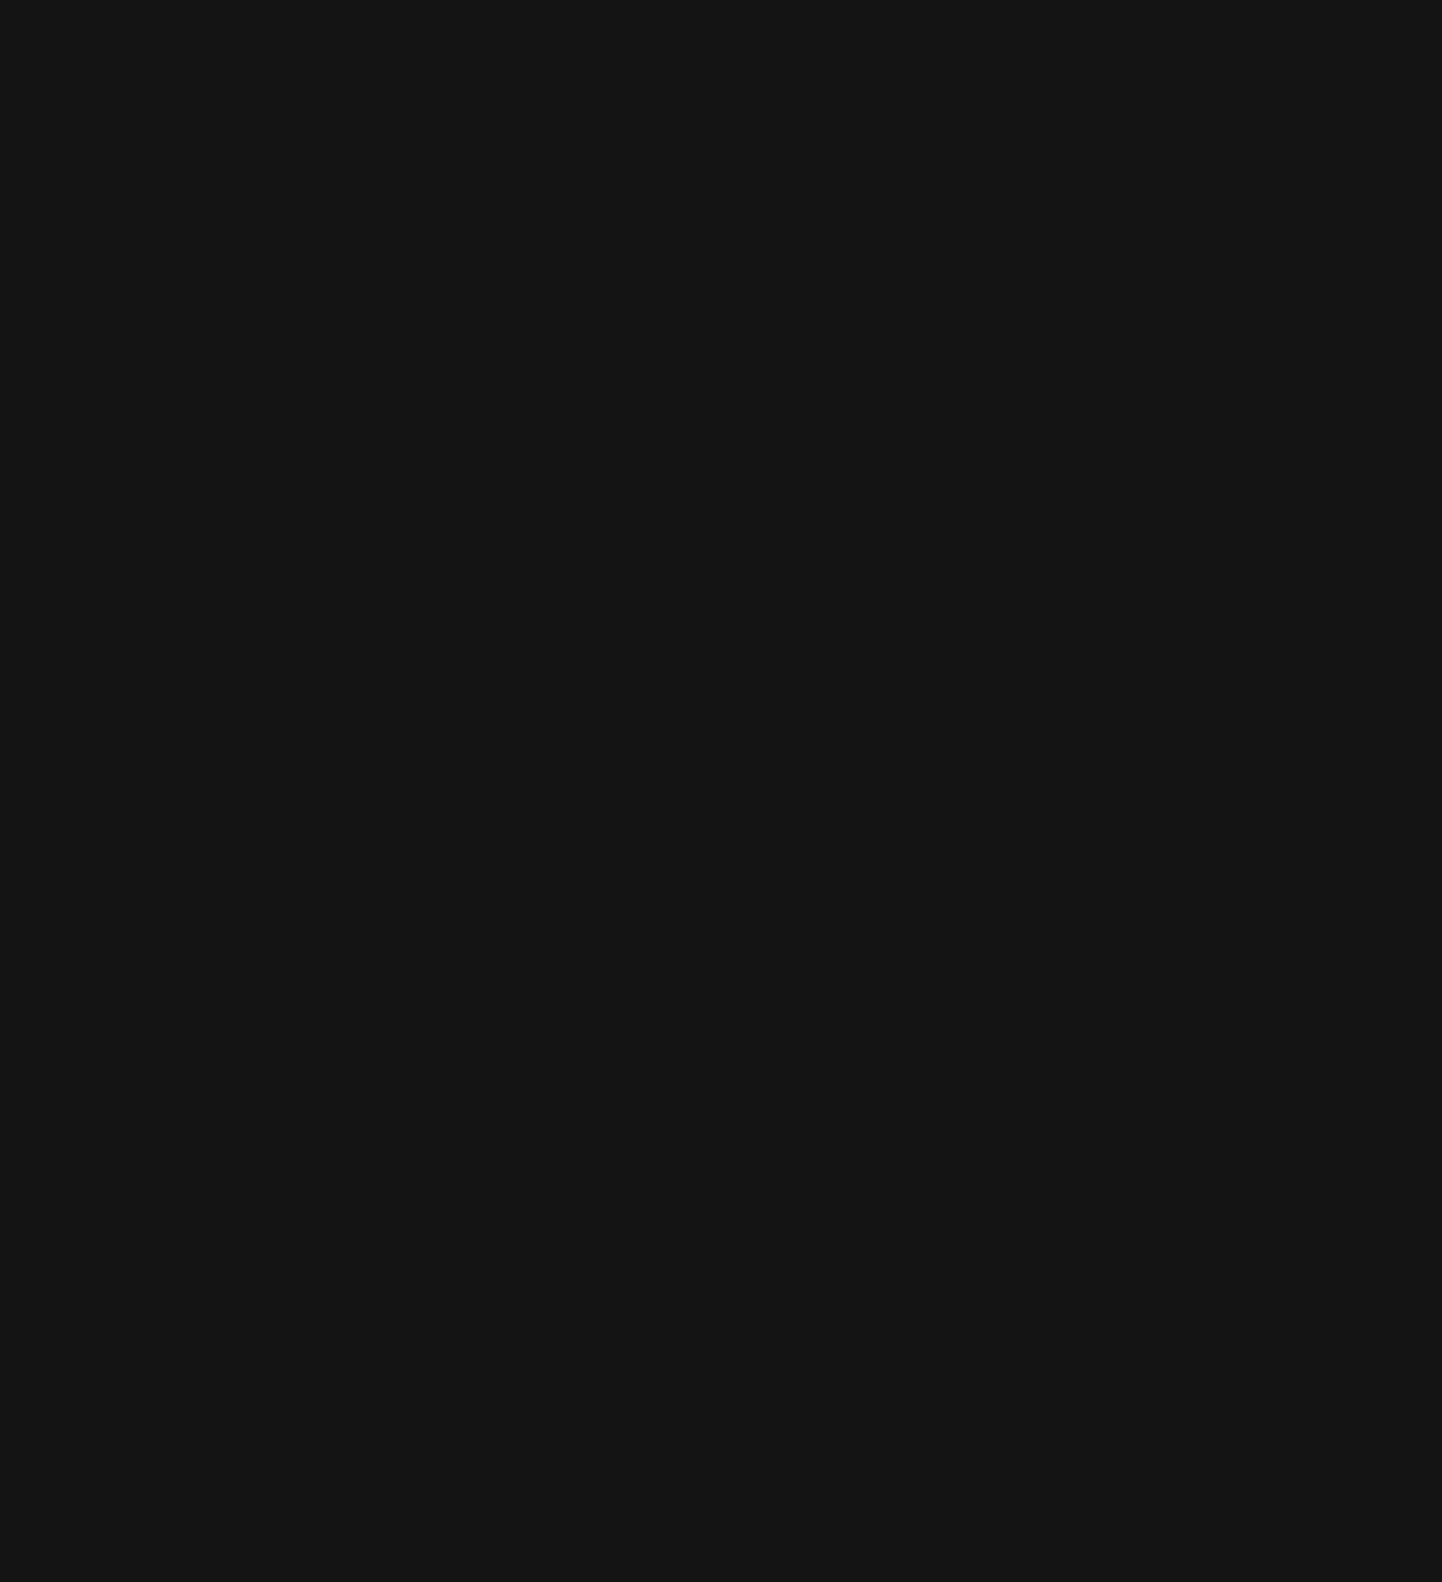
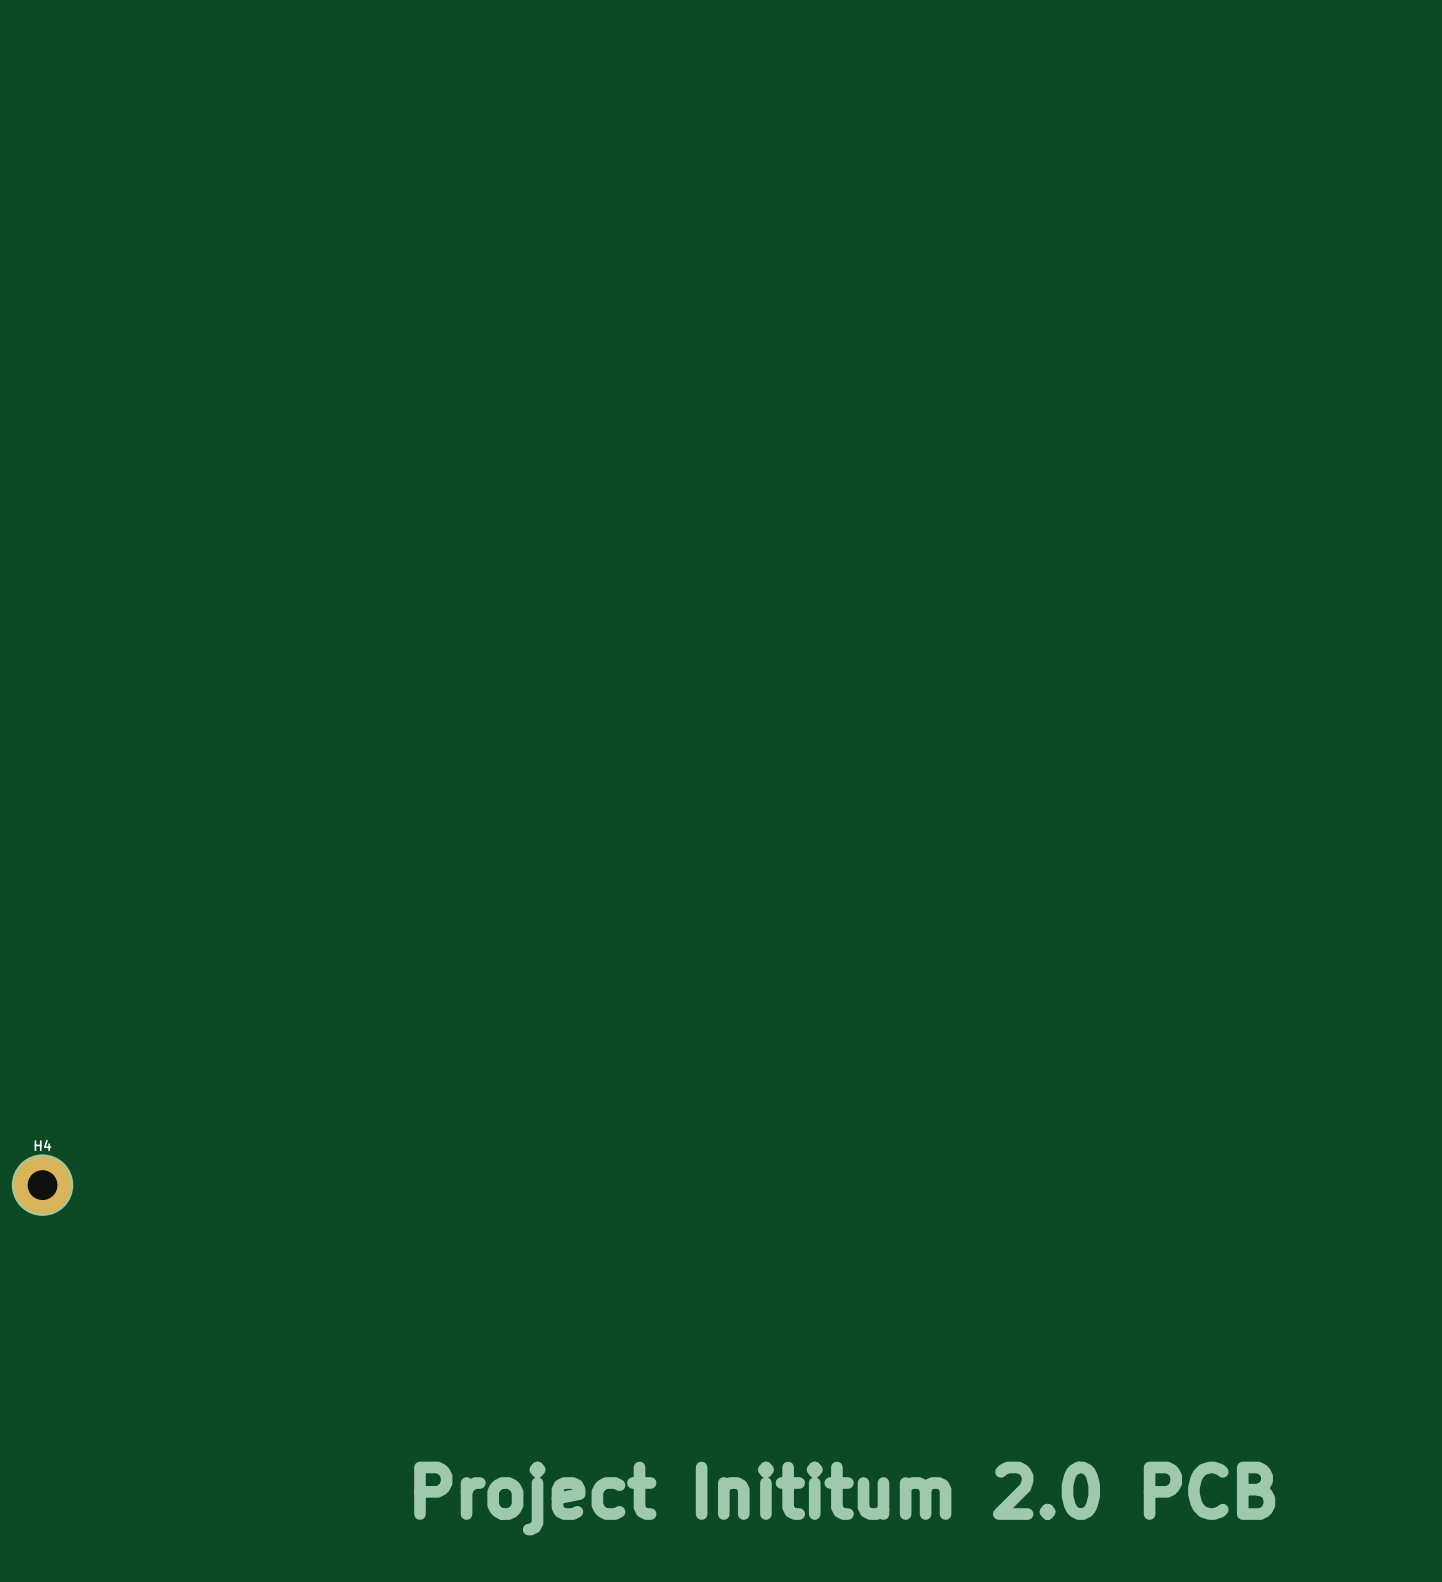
H4: none -> (42, 1185)
text: none -> Project Inititum 2.0 PCB (844, 1498)

